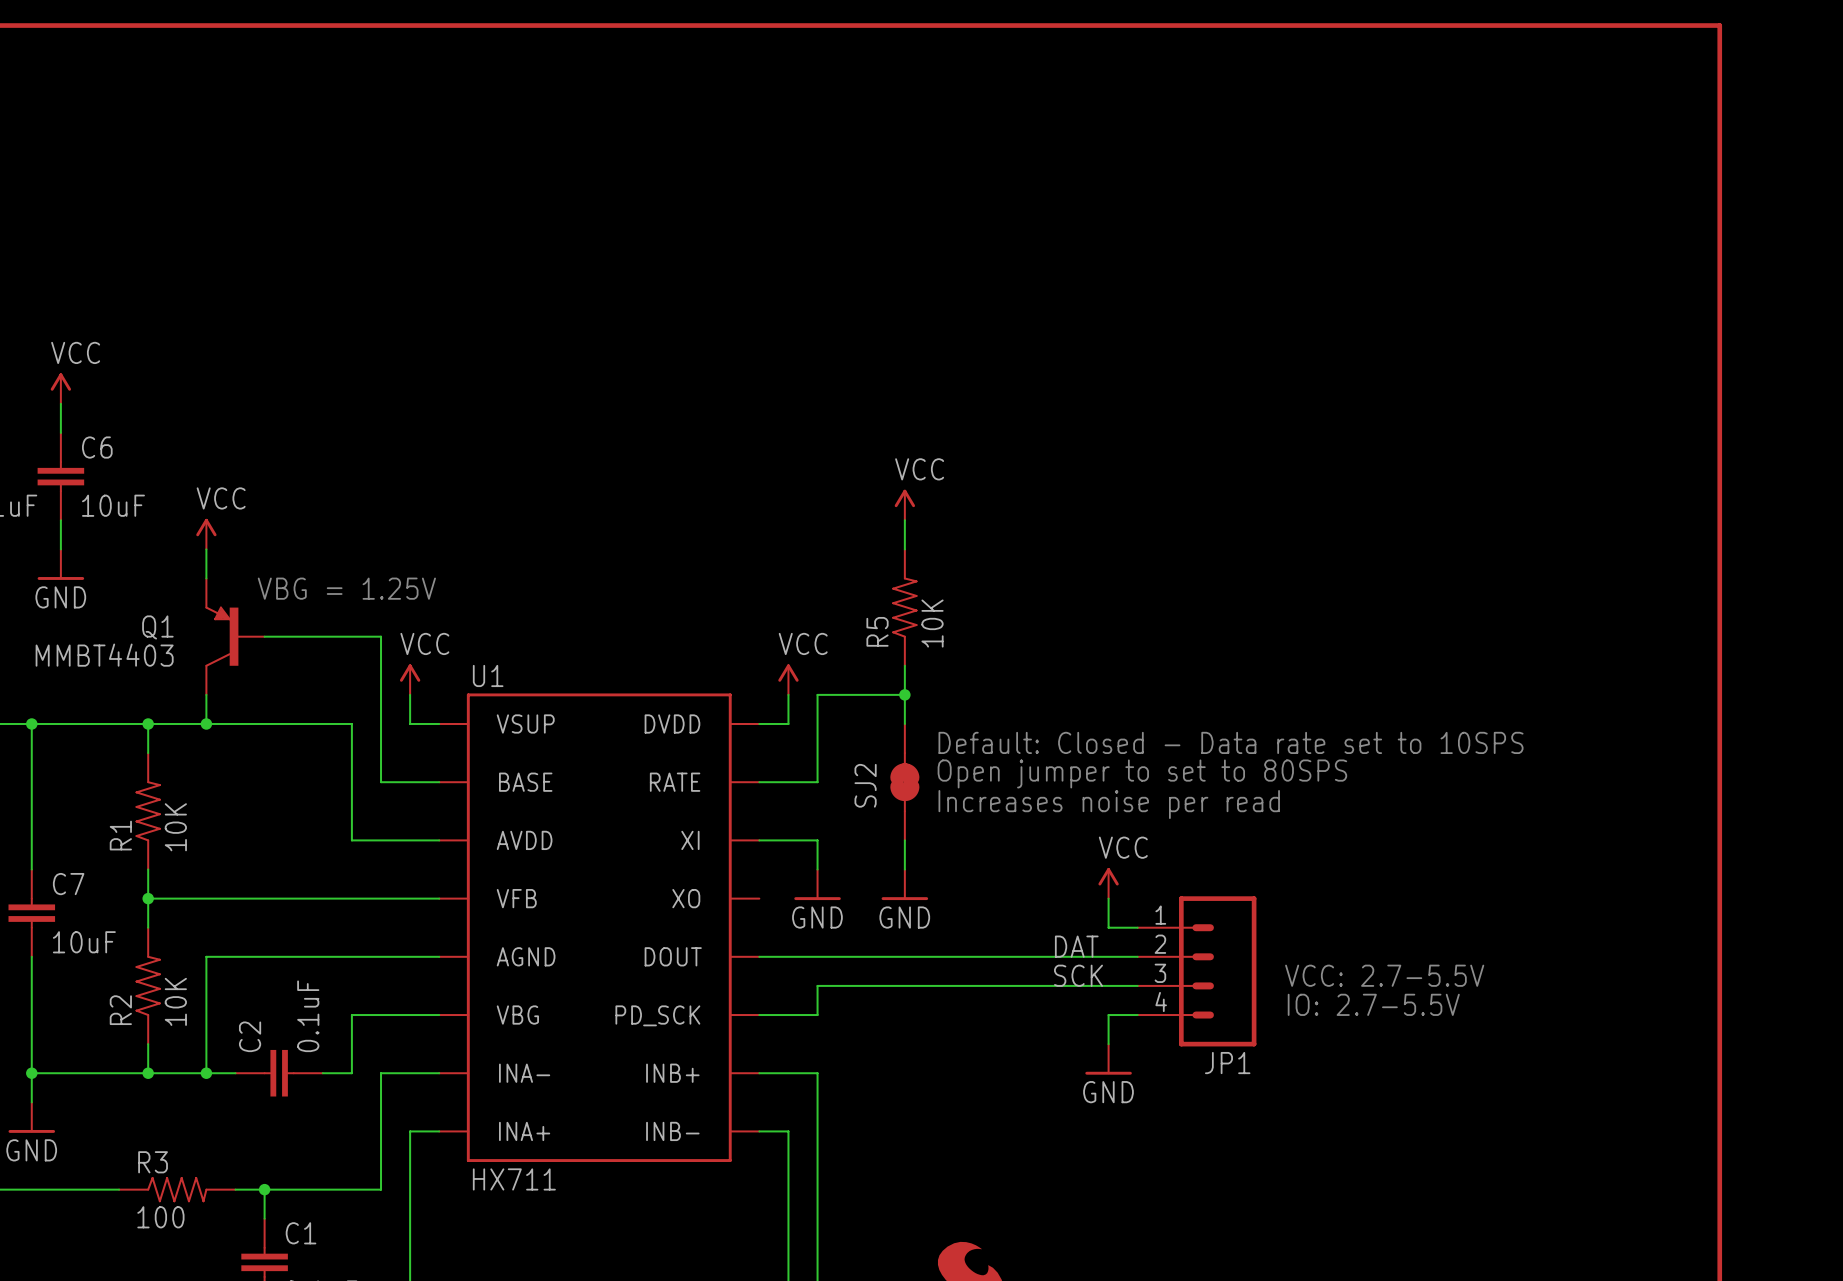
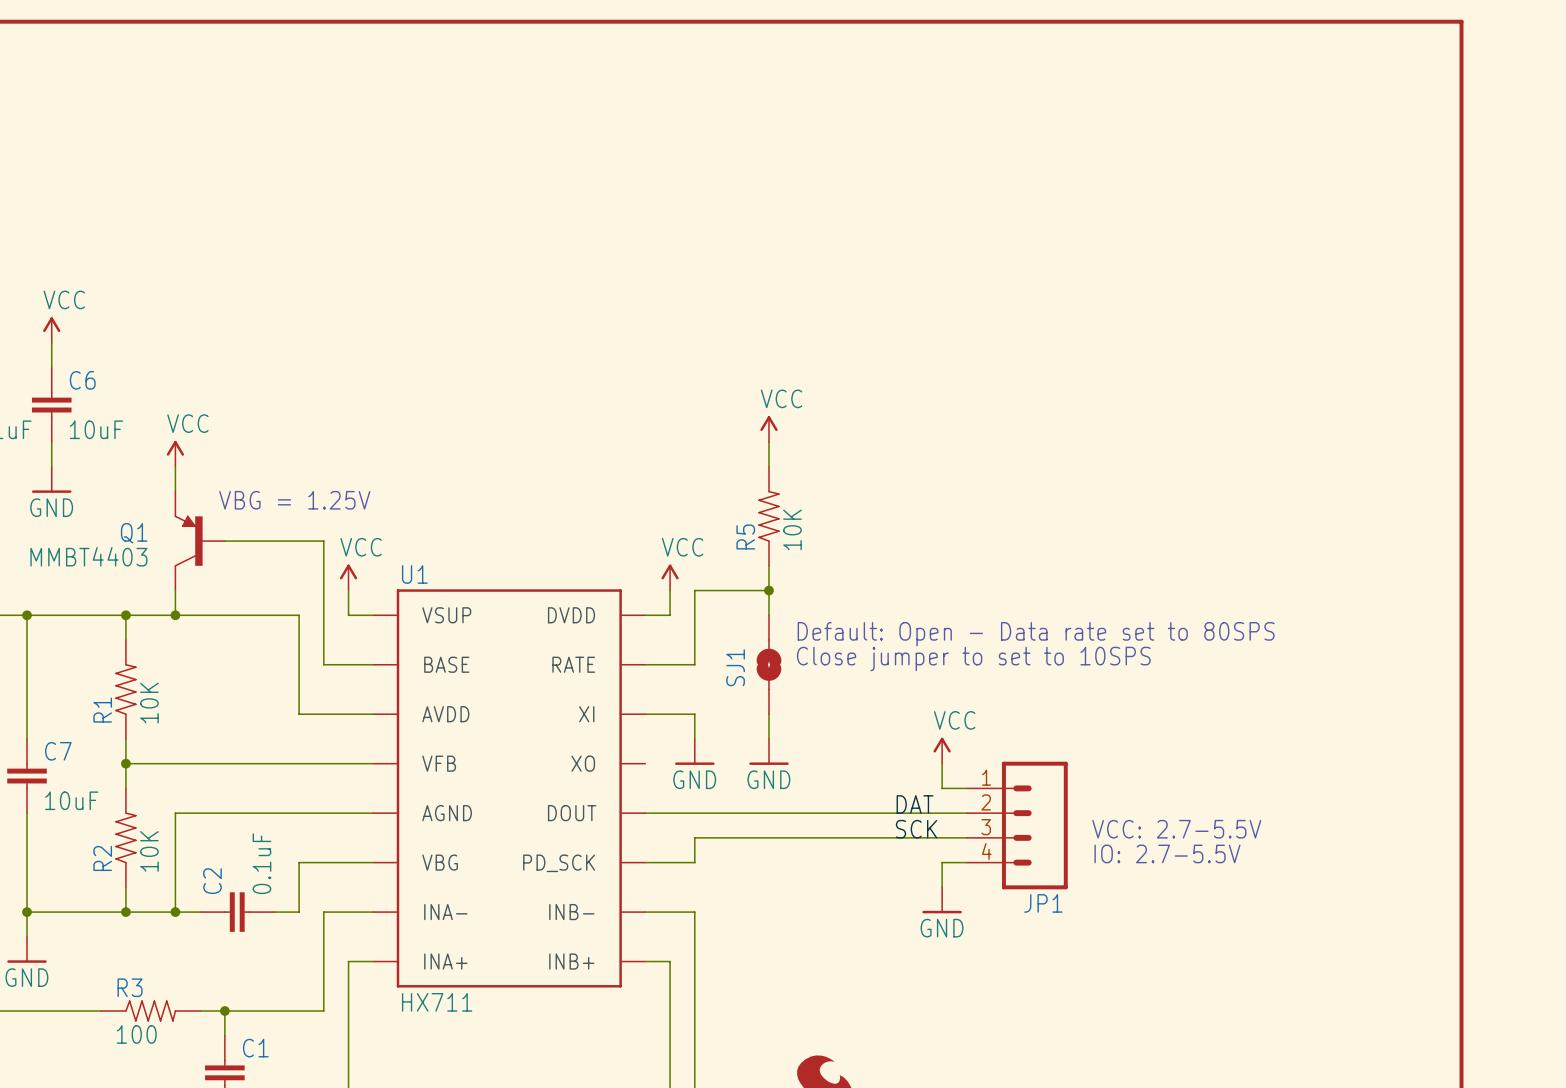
text: Default: Closed - Data rate set to 10SPS (1231, 742) -> Default: Open - Data rate set to 80SPS (1036, 634)
text: Open jumper to set to 80SPS (1142, 773) -> Close jumper to set to 10SPS (973, 658)
SJ2: (904, 782) -> none
SJ1: none -> (768, 664)
text: Increases noise per read (1109, 804) -> none
U1 pin name: INB+ (672, 1073) -> INB- (571, 912)
U1 pin name: INB- (672, 1131) -> INB+ (571, 961)

